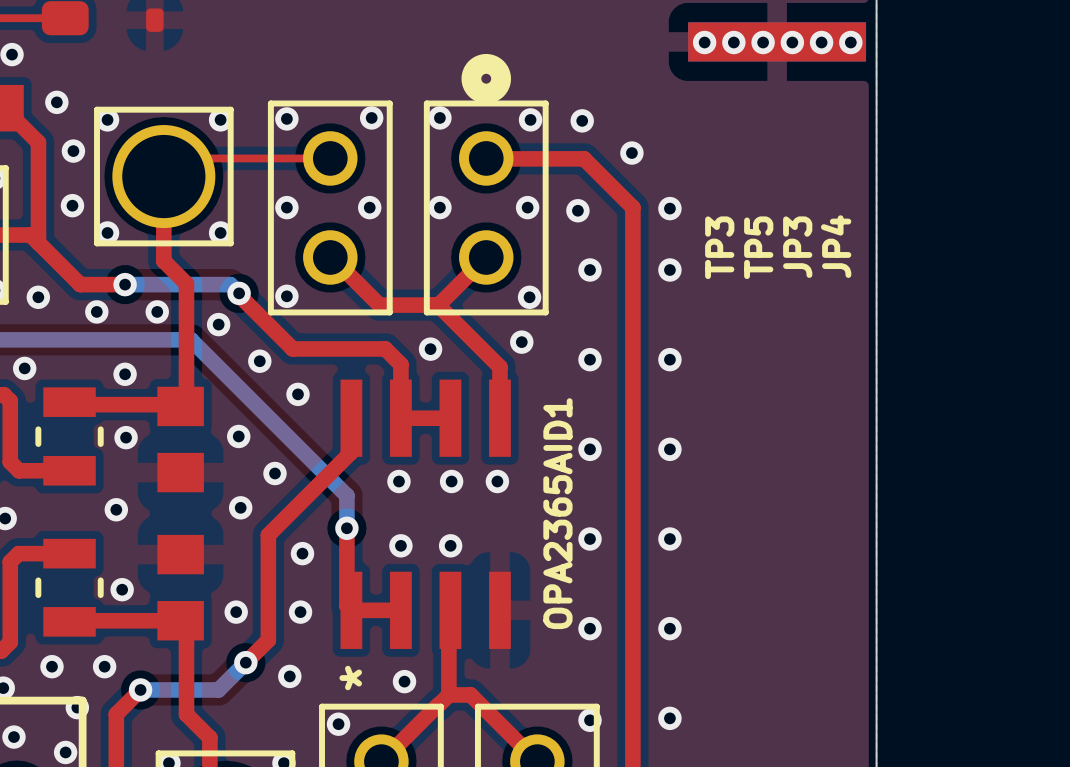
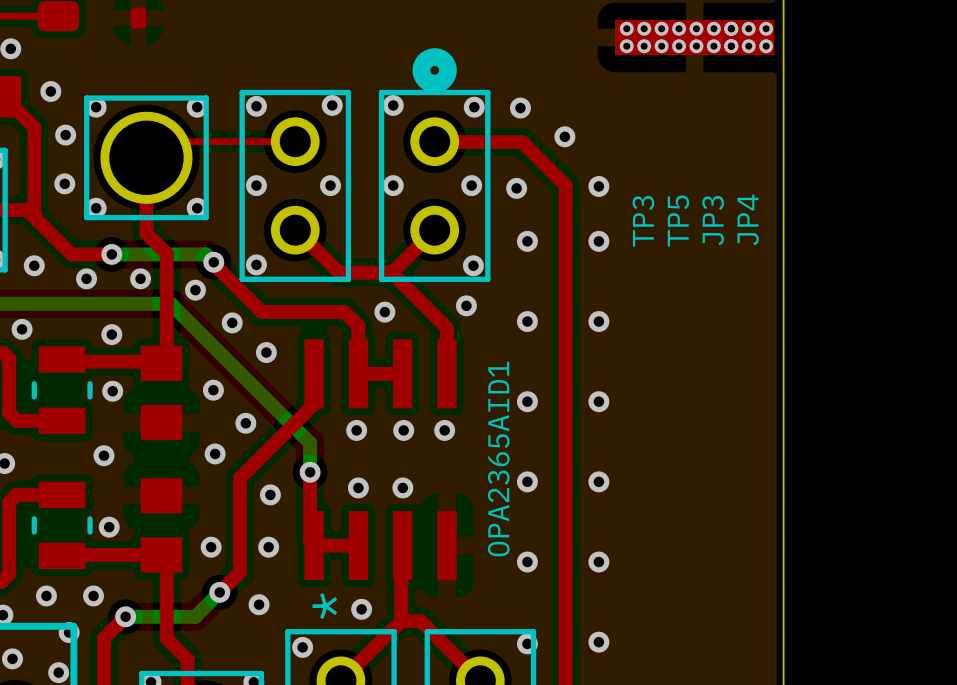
via: none -> (626, 28)
via: none -> (644, 28)
via: none -> (661, 28)
via: none -> (679, 28)
via: none -> (696, 28)
via: none -> (713, 28)
via: none -> (731, 28)
via: none -> (748, 28)
via: none -> (766, 28)
via: (704, 42) -> none
via: (733, 42) -> none
via: (763, 42) -> none
via: (792, 42) -> none
via: (821, 42) -> none
via: (850, 42) -> none
via: none -> (626, 46)
via: none -> (644, 46)
via: none -> (661, 46)
via: none -> (679, 46)
via: none -> (696, 46)
via: none -> (713, 46)
via: none -> (731, 46)
via: none -> (748, 46)
via: none -> (766, 46)

